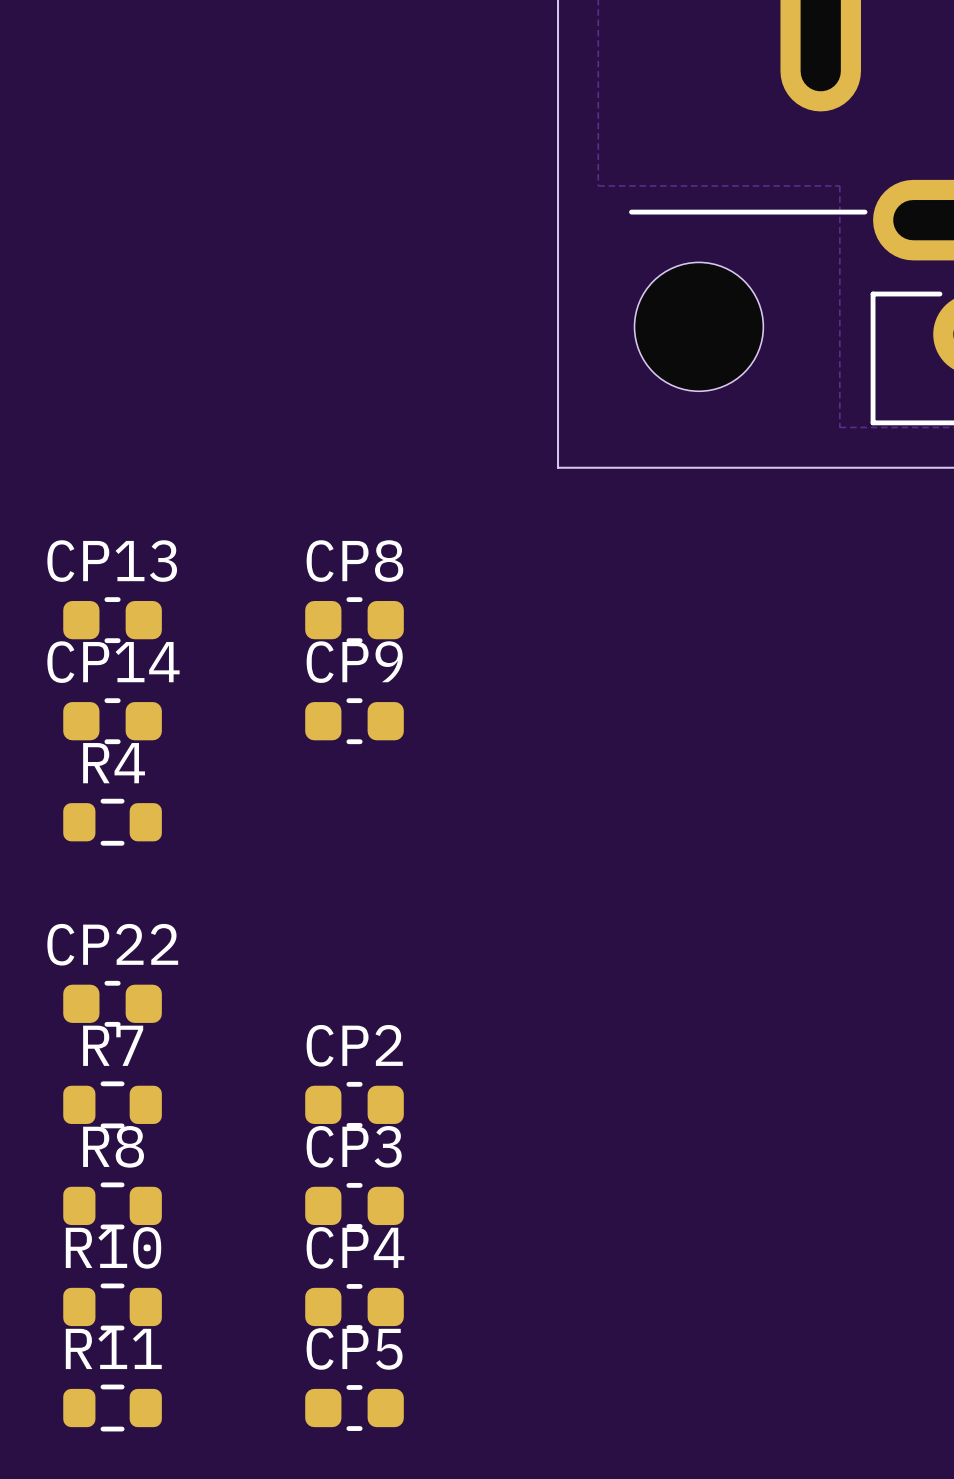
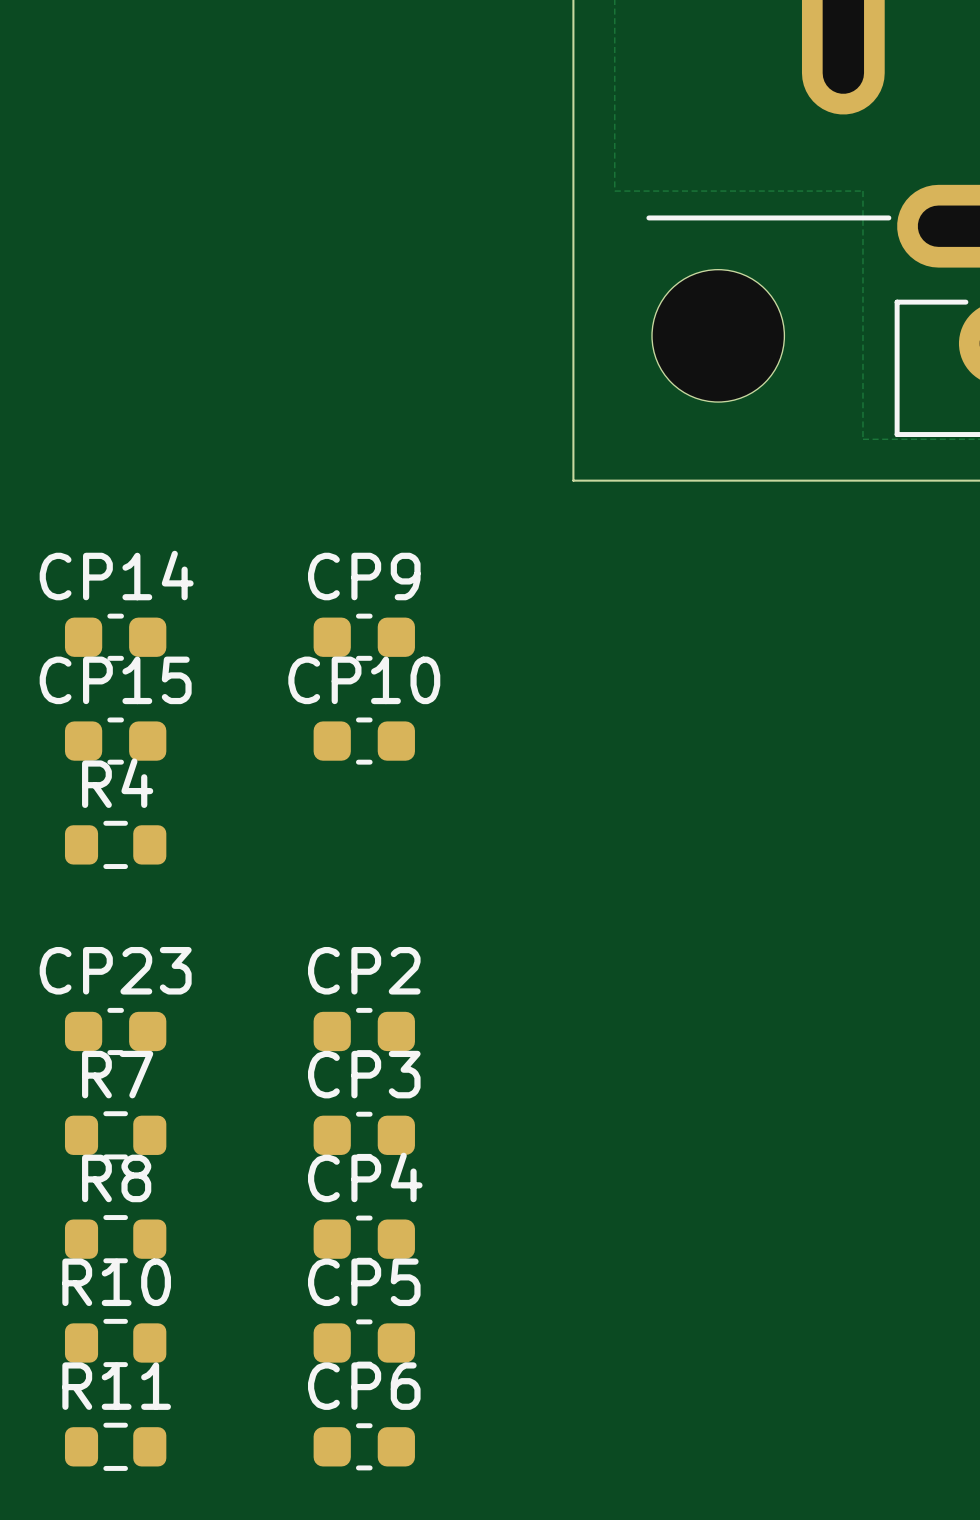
CP13 name: CP13 (112, 561) -> CP14 (116, 575)
CP8 name: CP8 (354, 561) -> CP9 (364, 576)
CP14 name: CP14 (113, 662) -> CP15 (115, 680)
CP9 name: CP9 (354, 662) -> CP10 (364, 680)
CP22 name: CP22 (112, 944) -> CP23 (115, 970)
CP2: none -> (364, 1031)
CP2 name: CP2 (354, 1045) -> CP3 (364, 1074)
CP3 name: CP3 (354, 1146) -> CP4 (365, 1177)
CP4 name: CP4 (355, 1247) -> CP5 (364, 1282)
CP5 name: CP5 (354, 1348) -> CP6 (364, 1386)

